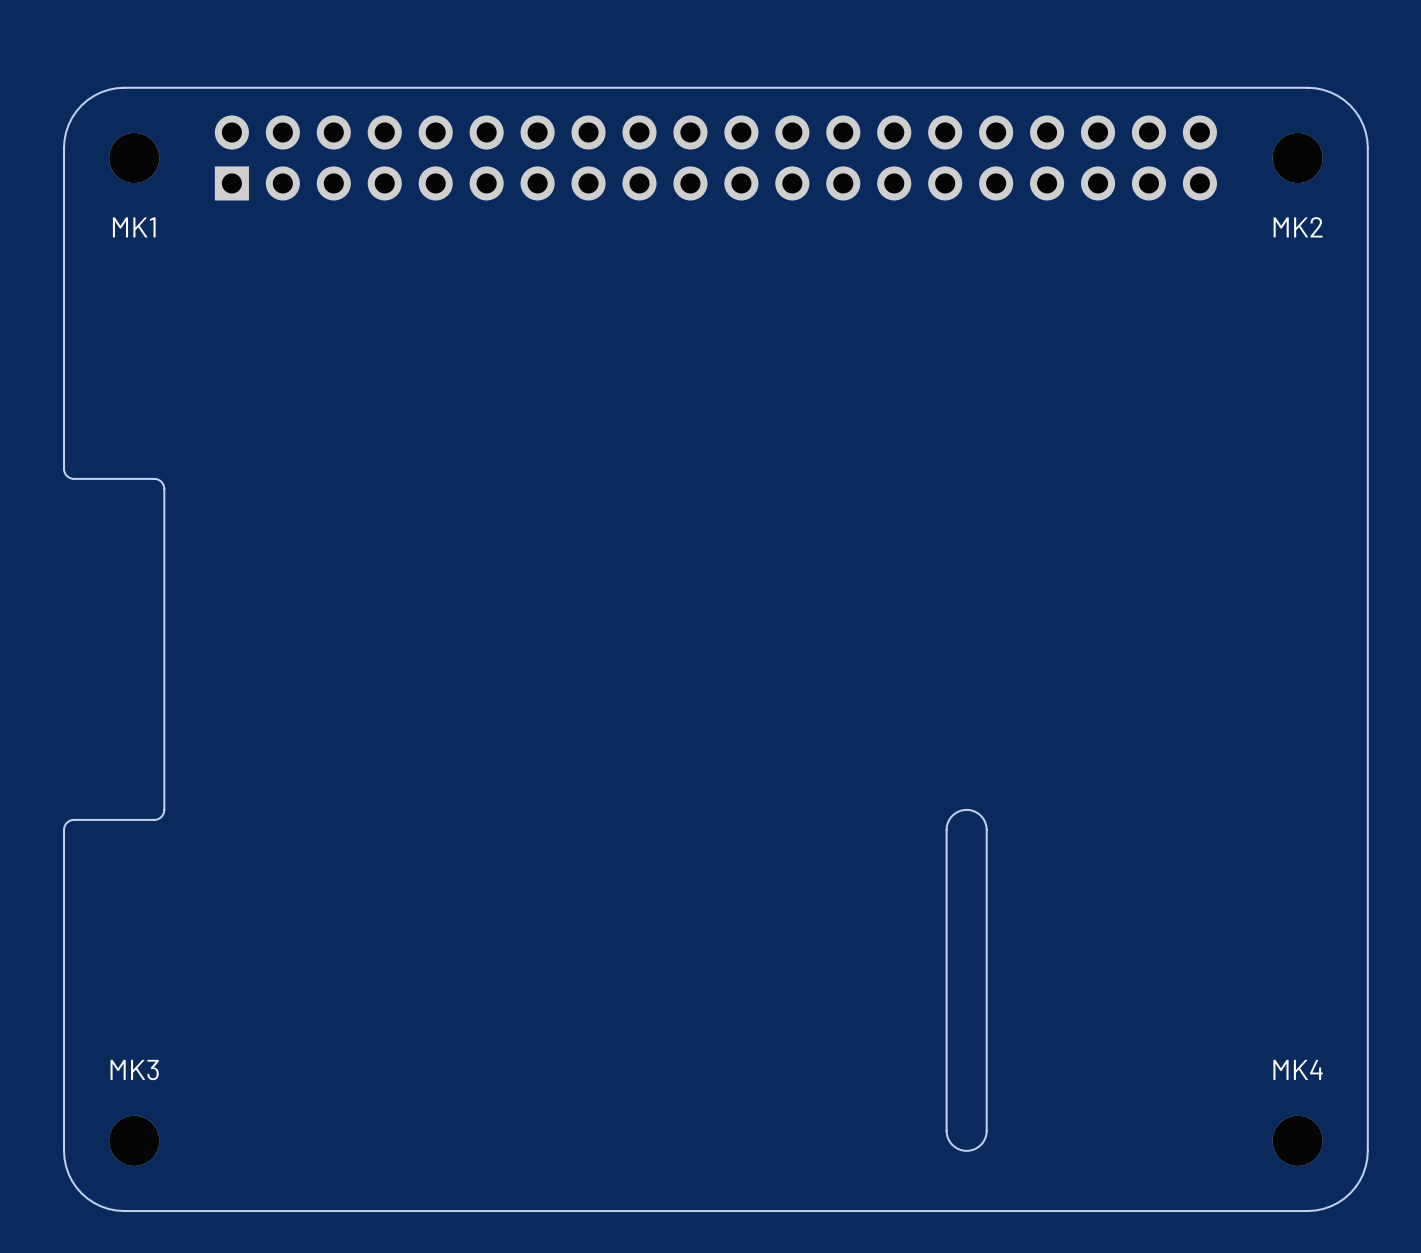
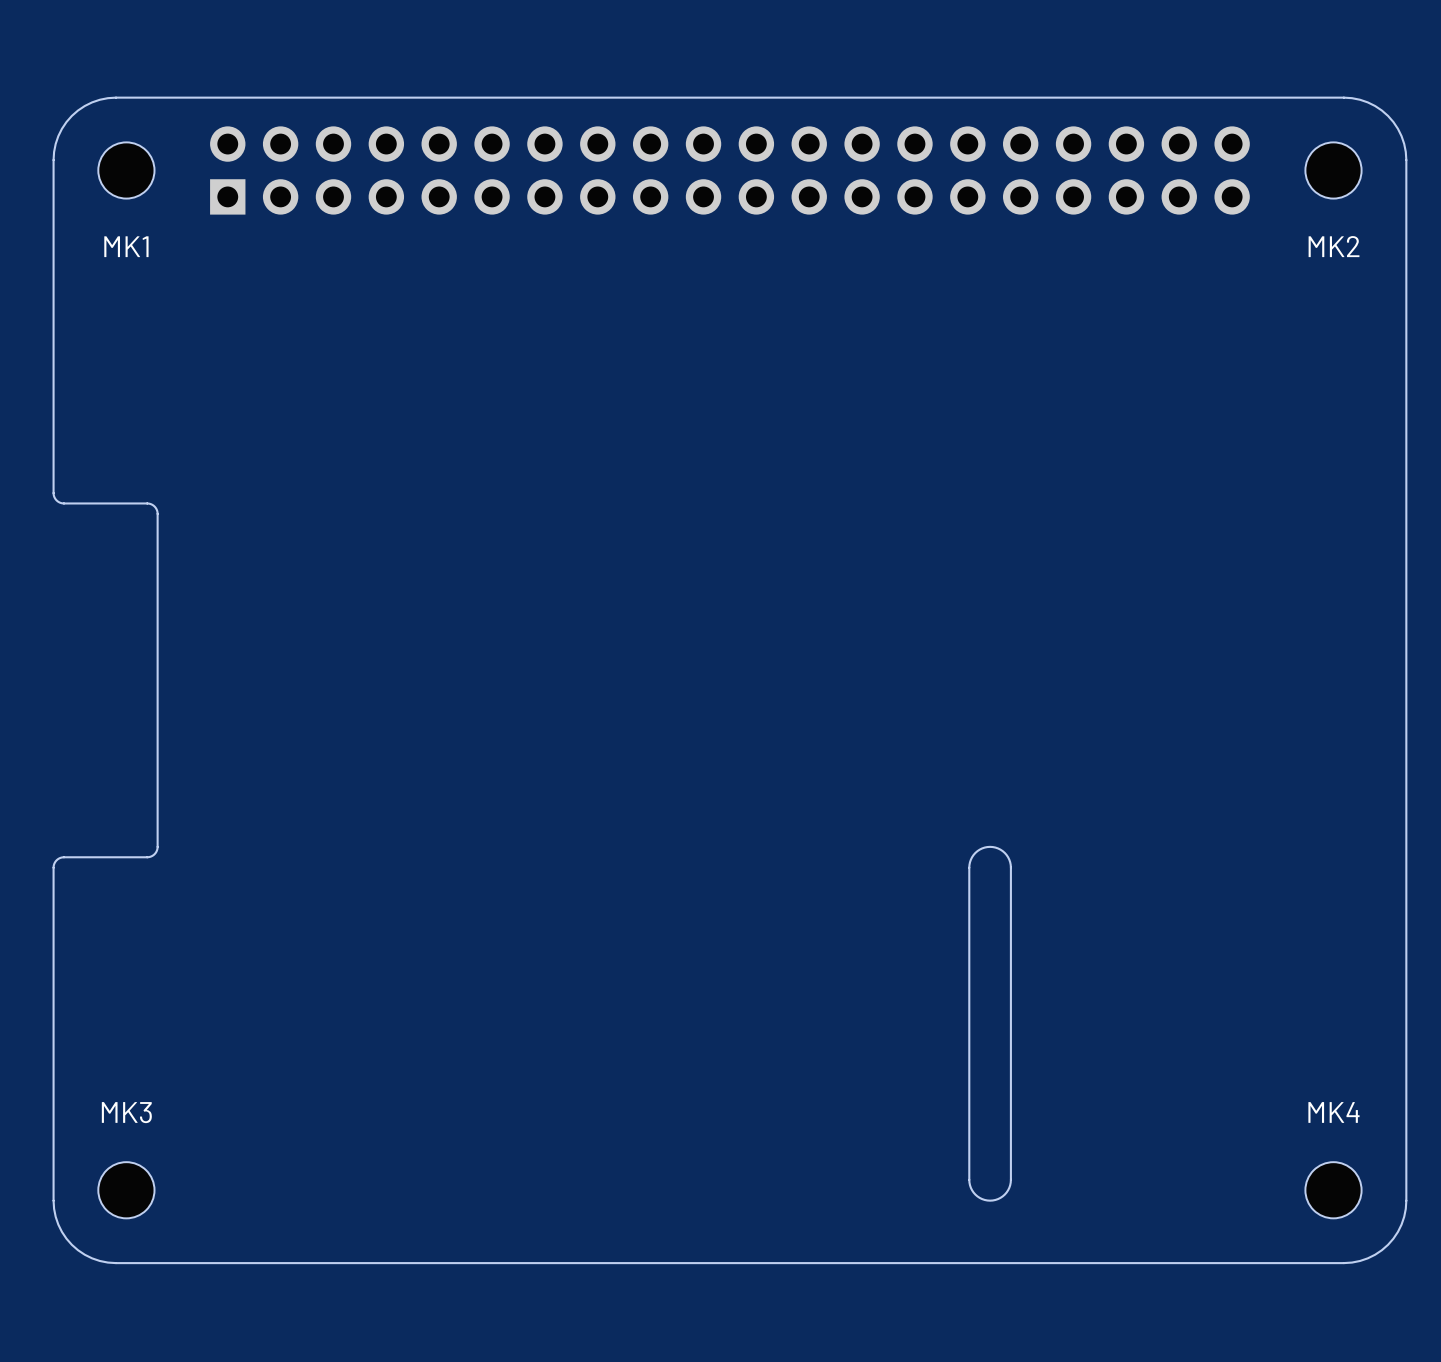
MK1 footprint: [109, 132, 160, 184] -> [98, 142, 155, 199]
MK2 footprint: [1272, 132, 1323, 184] -> [1305, 142, 1362, 199]
MK3 footprint: [109, 1115, 160, 1166] -> [98, 1162, 155, 1219]
MK4 footprint: [1272, 1115, 1323, 1166] -> [1305, 1162, 1362, 1219]

